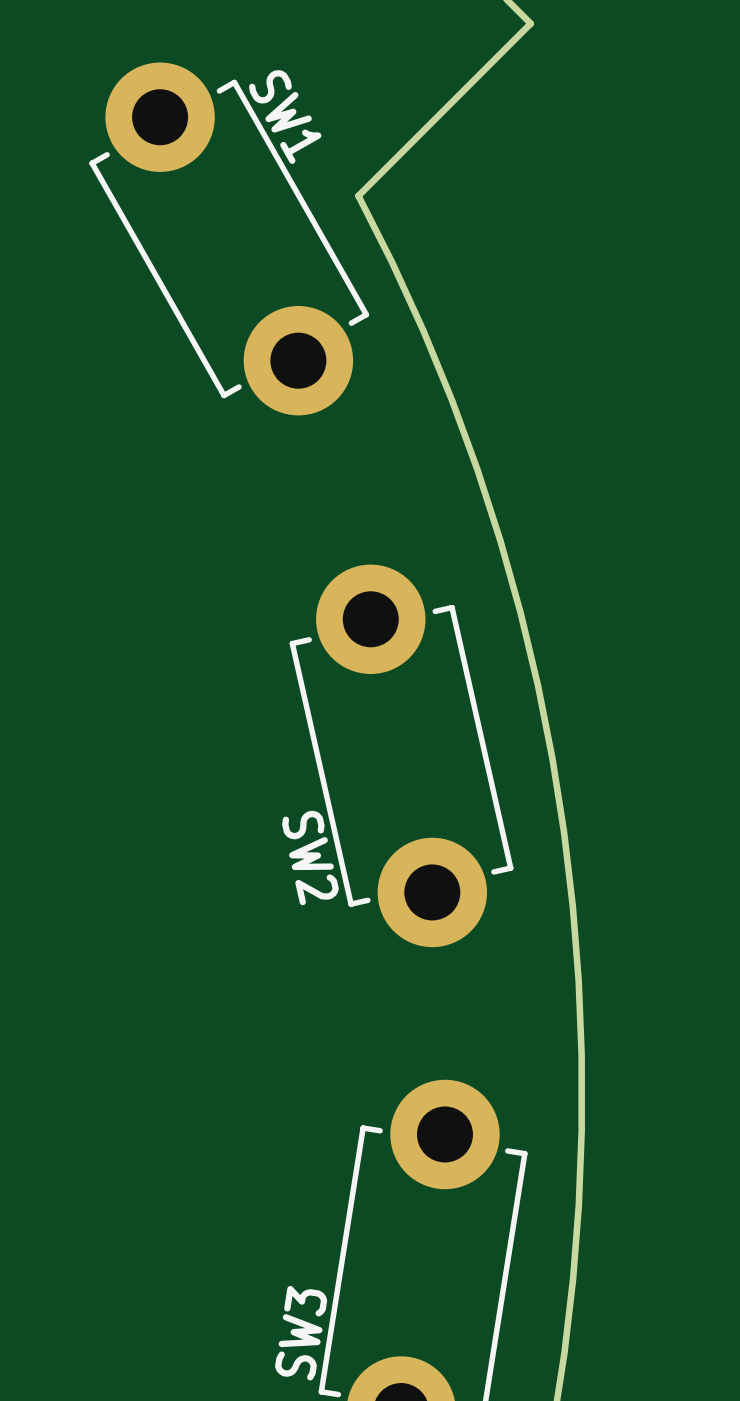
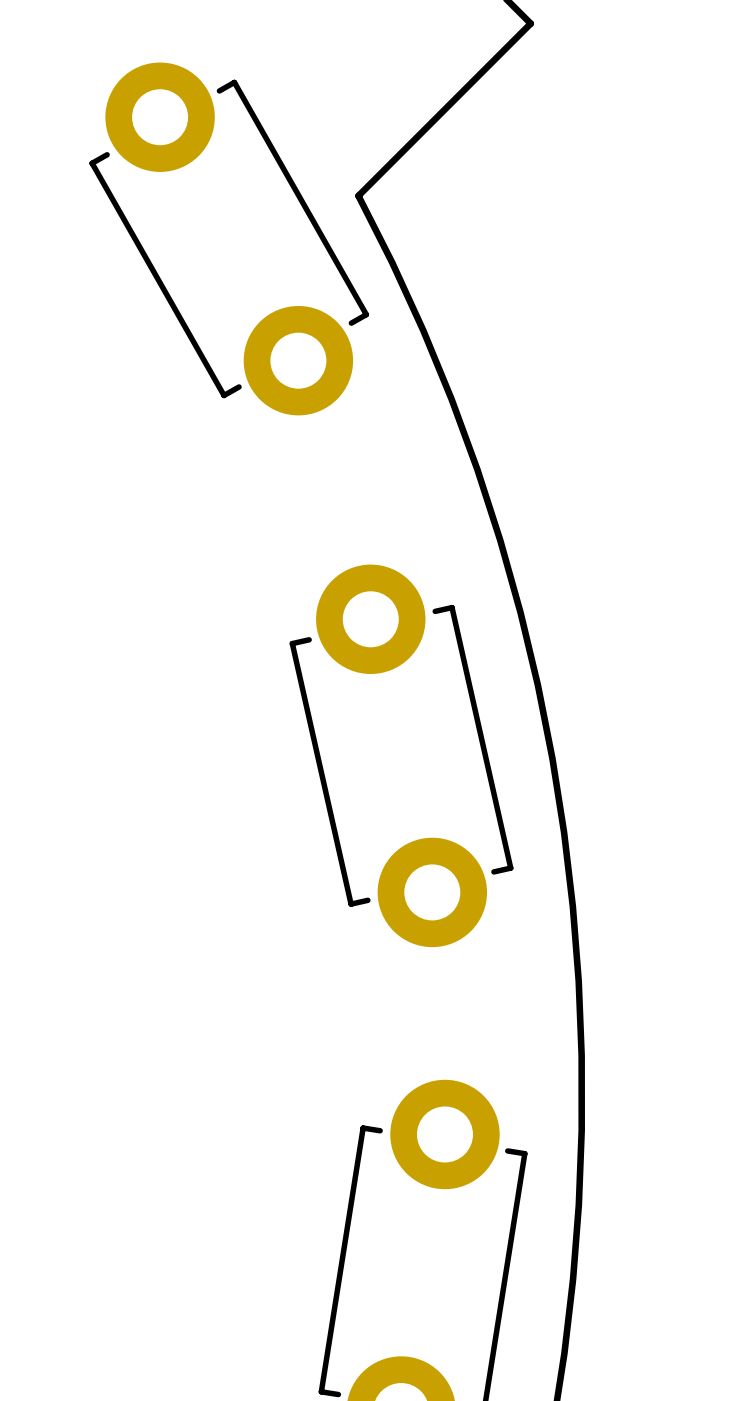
SW1 name: SW1 (285, 117) -> none
SW2 name: SW2 (310, 857) -> none
SW3 name: SW3 (301, 1333) -> none

